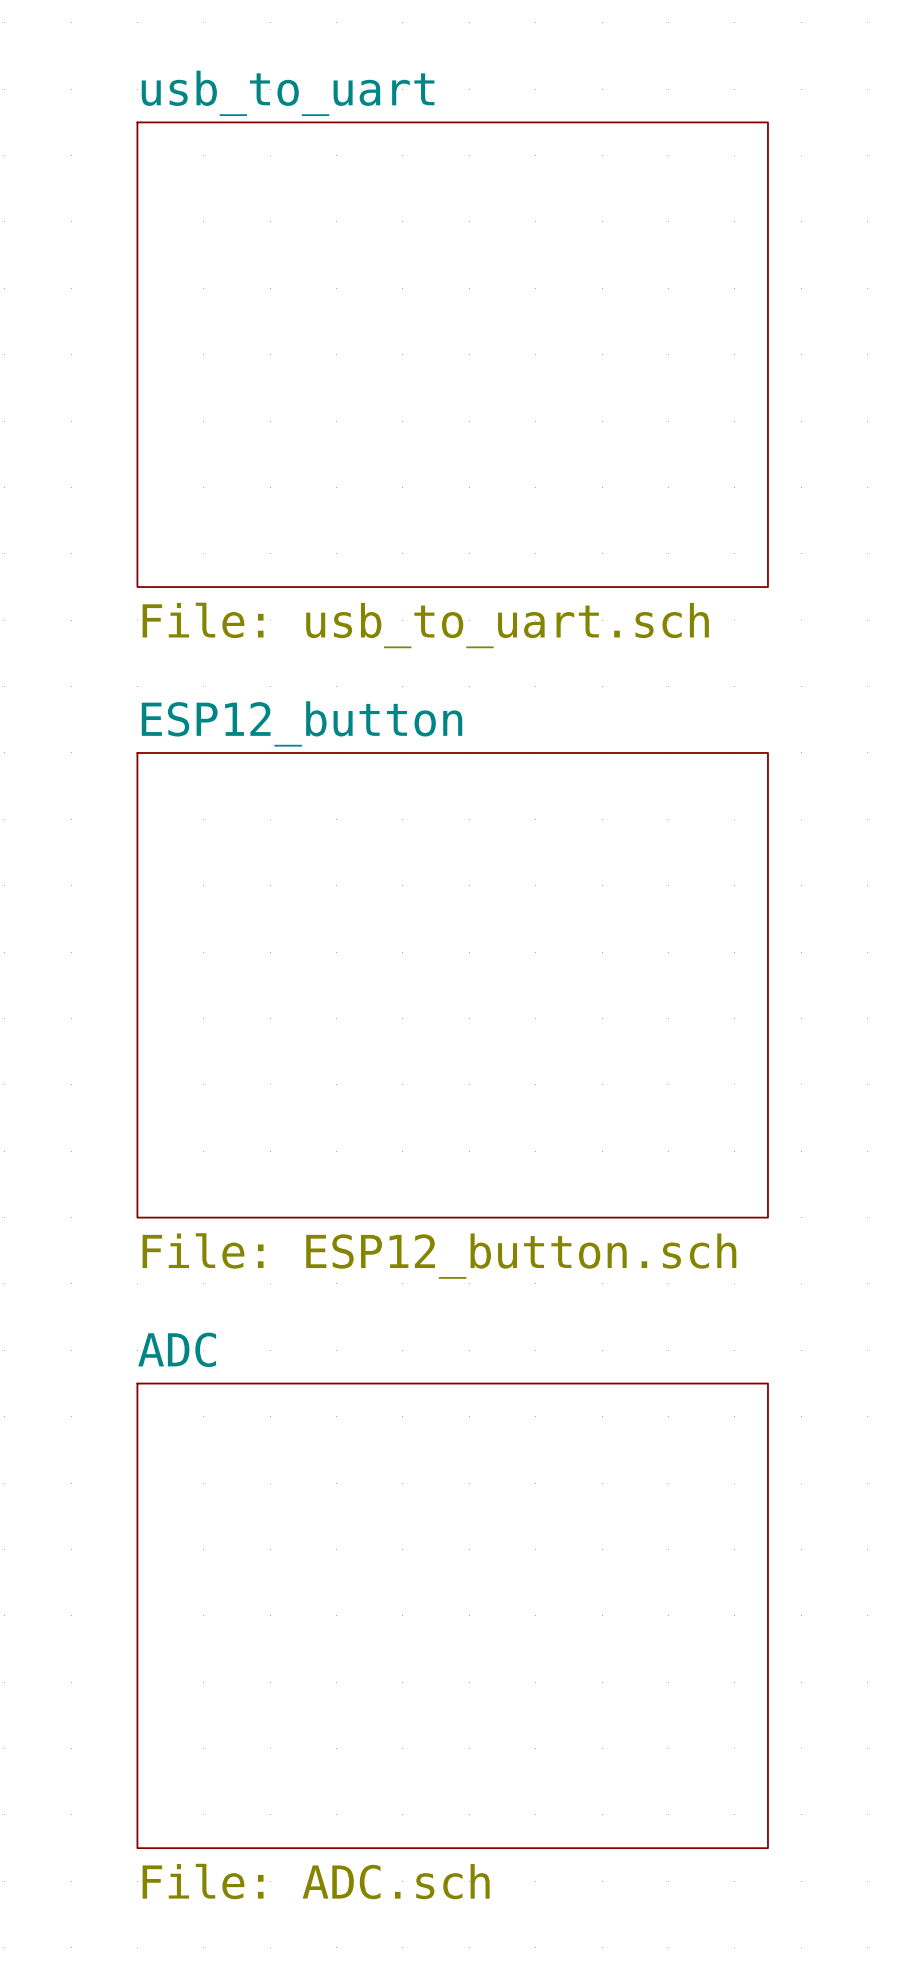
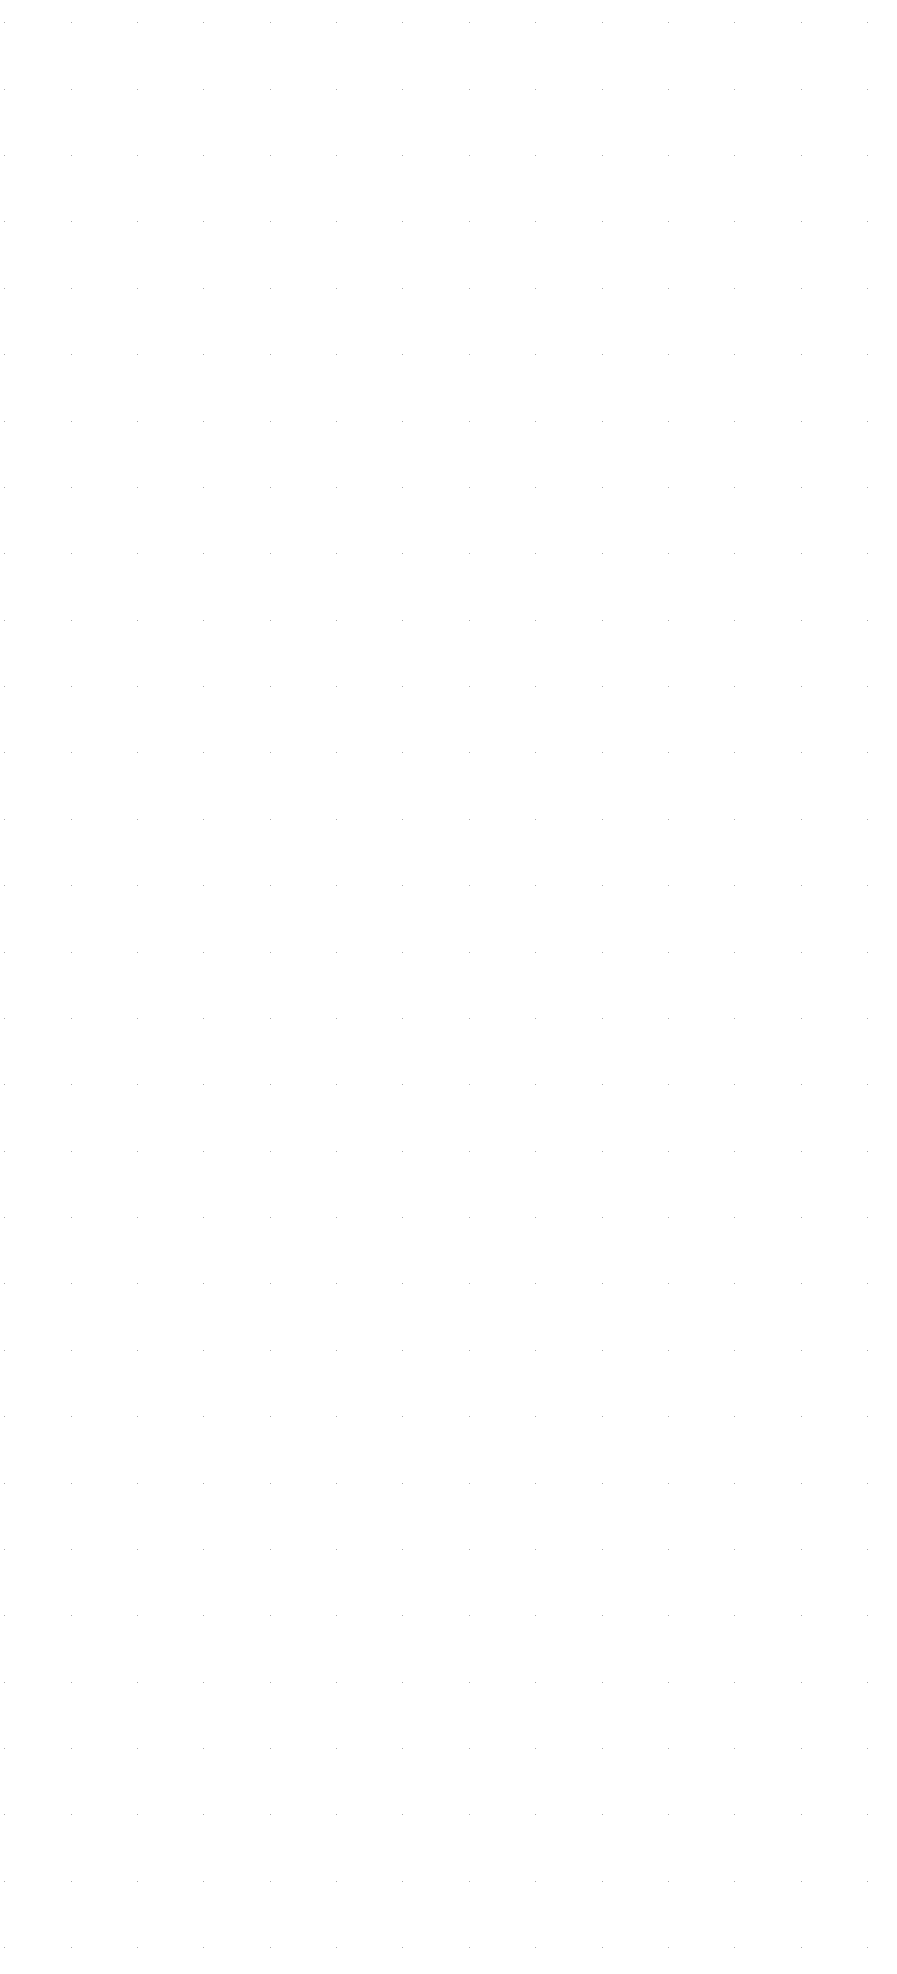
sheet usb_to_uart: File: usb_to_uart.sch (452, 354) -> none
sheet ESP12_button: File: ESP12_button.sch (452, 985) -> none
sheet ADC: File: ADC.sch (452, 1615) -> none

